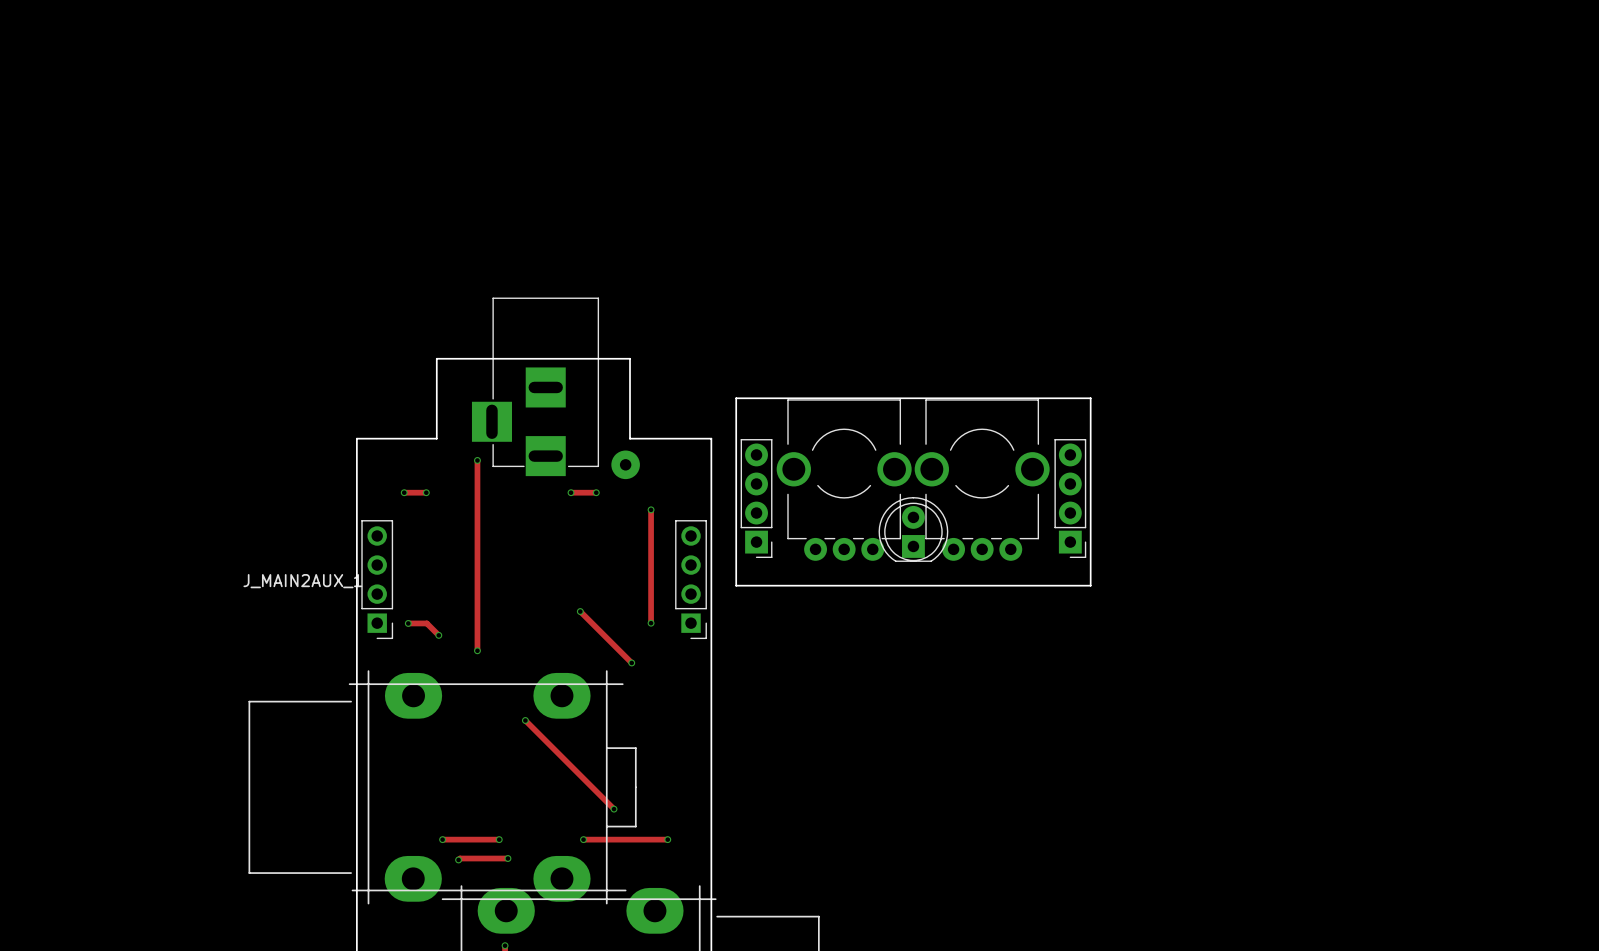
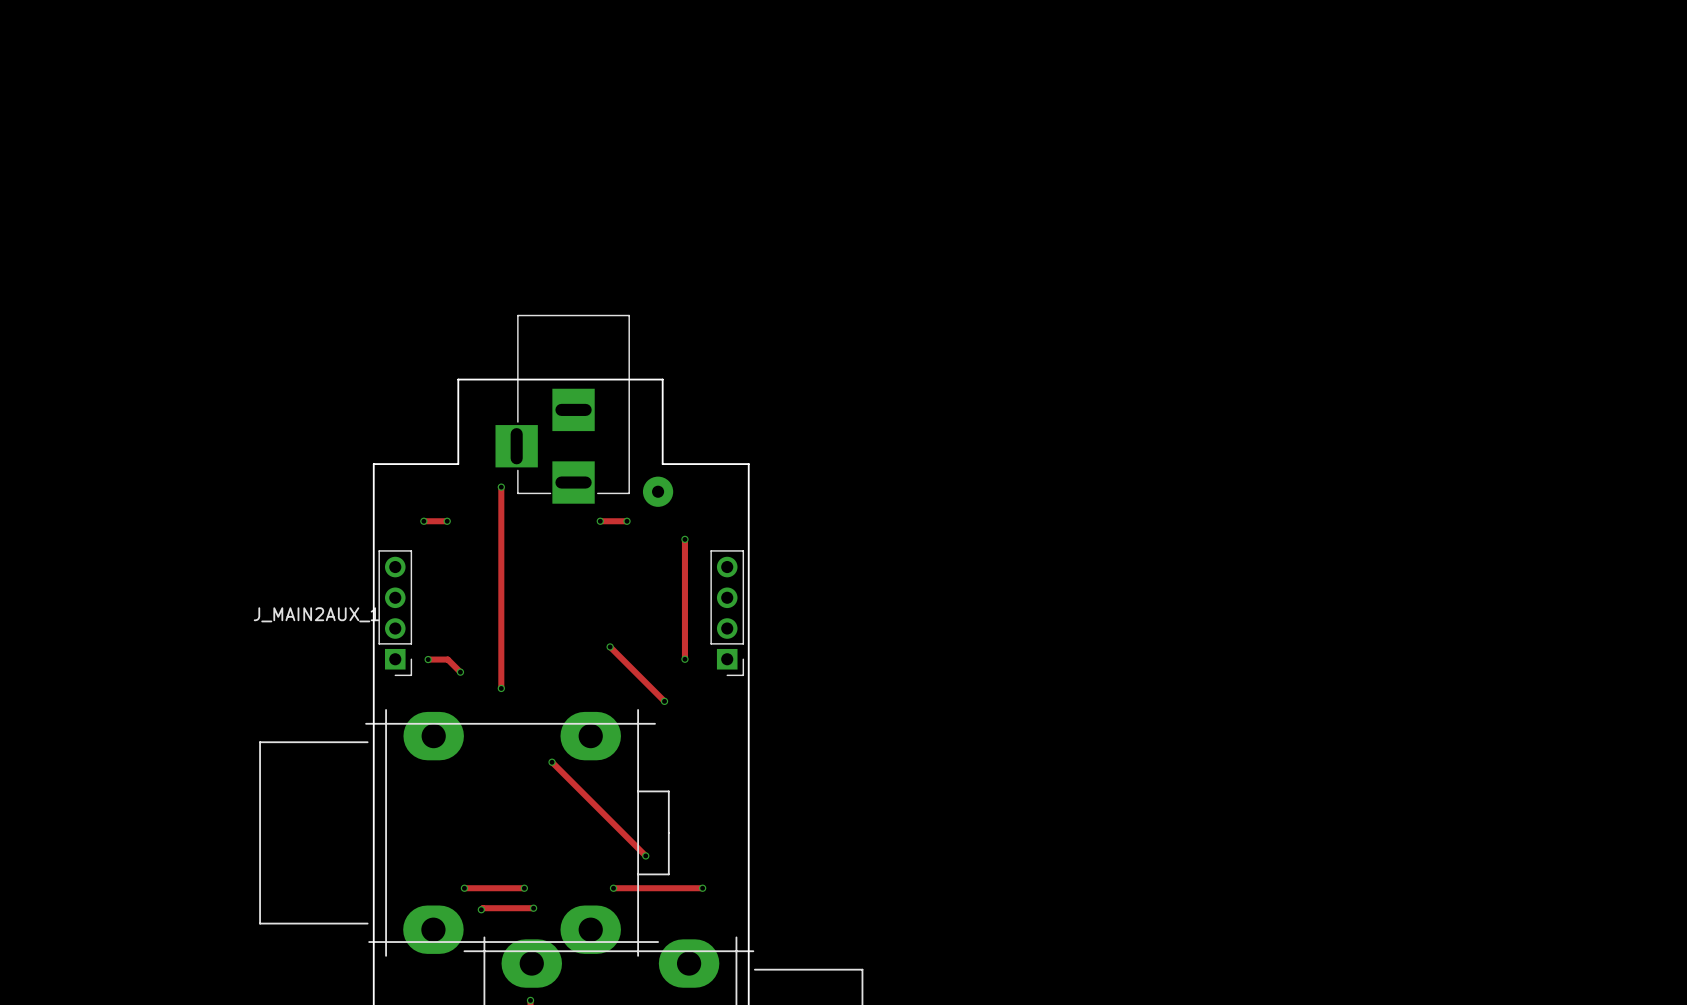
board edge: (736, 398) (736, 585) (1090, 585) (1090, 398) (736, 398) -> none
part: (844, 480) -> none
part: (982, 480) -> none
part: (756, 498) -> none
part: (1070, 498) -> none
part: (913, 529) -> none

